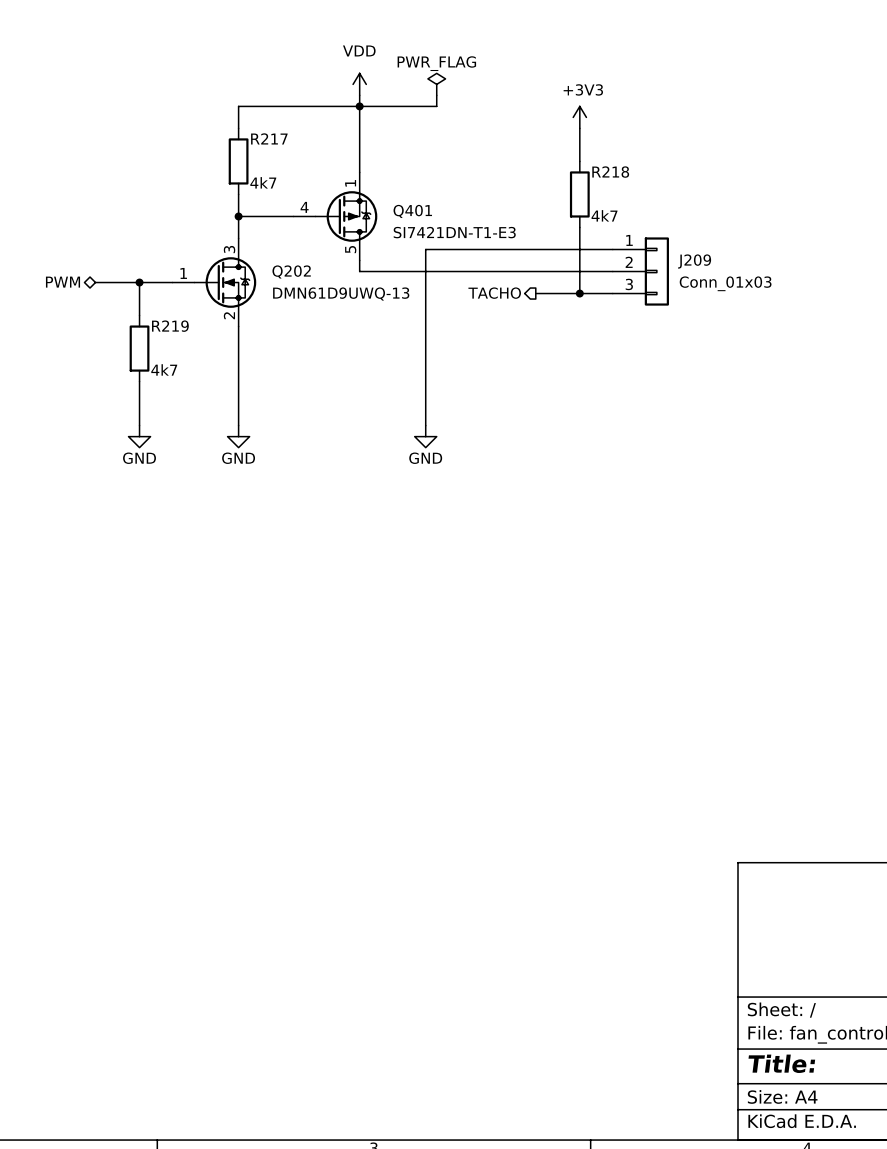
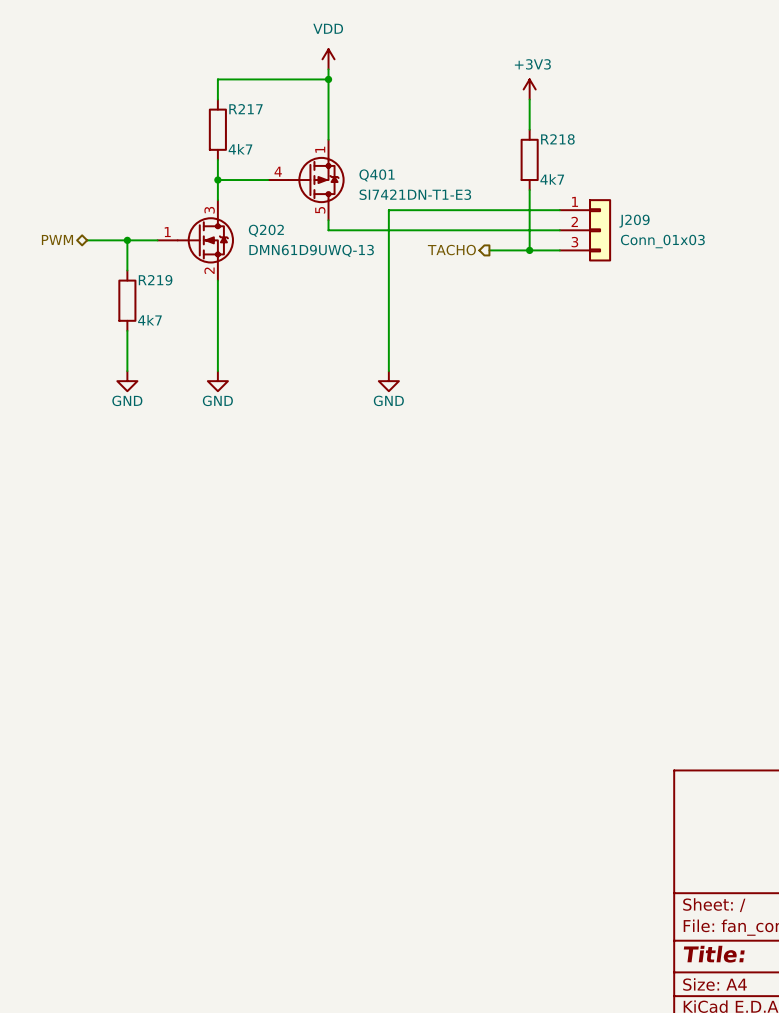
power symbol: PWR_FLAG (436, 84) -> none
wire: (436, 95) (436, 106) (359, 106) -> none

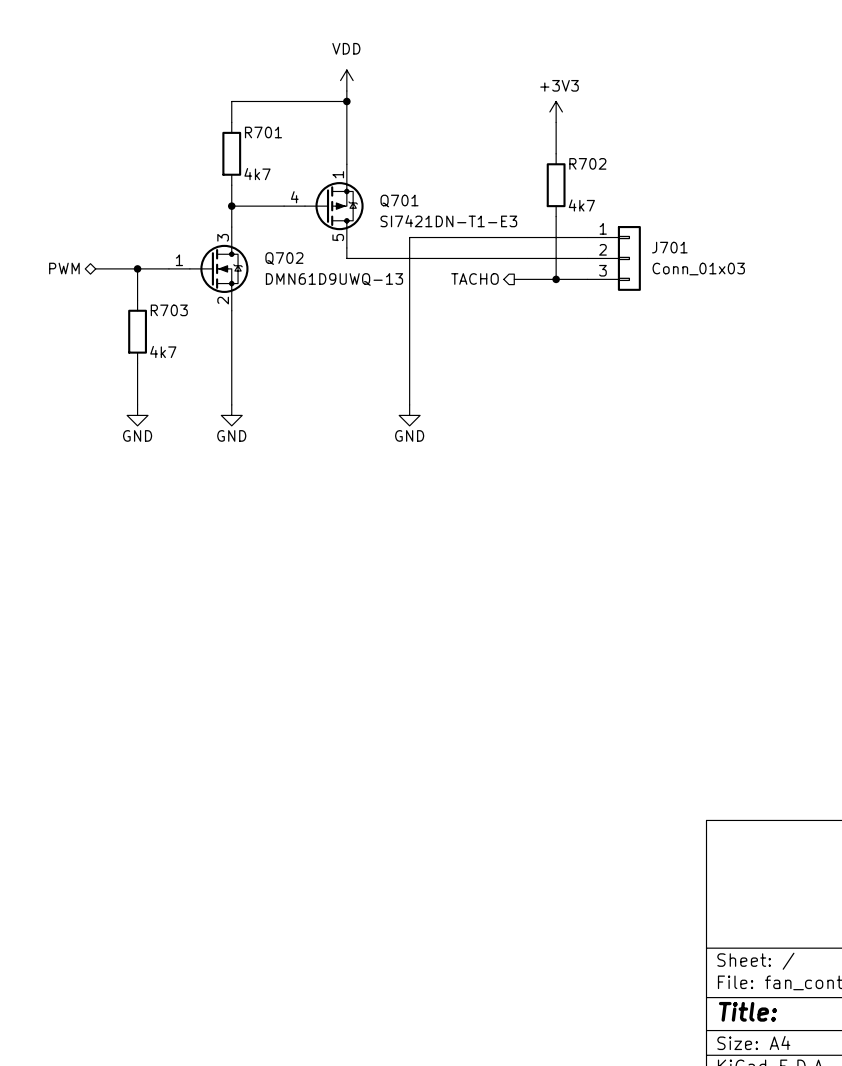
R217 name: R217 (245, 109) -> R701 (263, 132)
R218 name: R218 (557, 139) -> R702 (587, 163)
Q401 name: Q401 (377, 175) -> Q701 (399, 201)
J209 name: J209 (634, 221) -> J701 (669, 247)
Q202 name: Q202 (266, 230) -> Q702 (284, 258)
R219 name: R219 (155, 280) -> R703 (169, 310)

